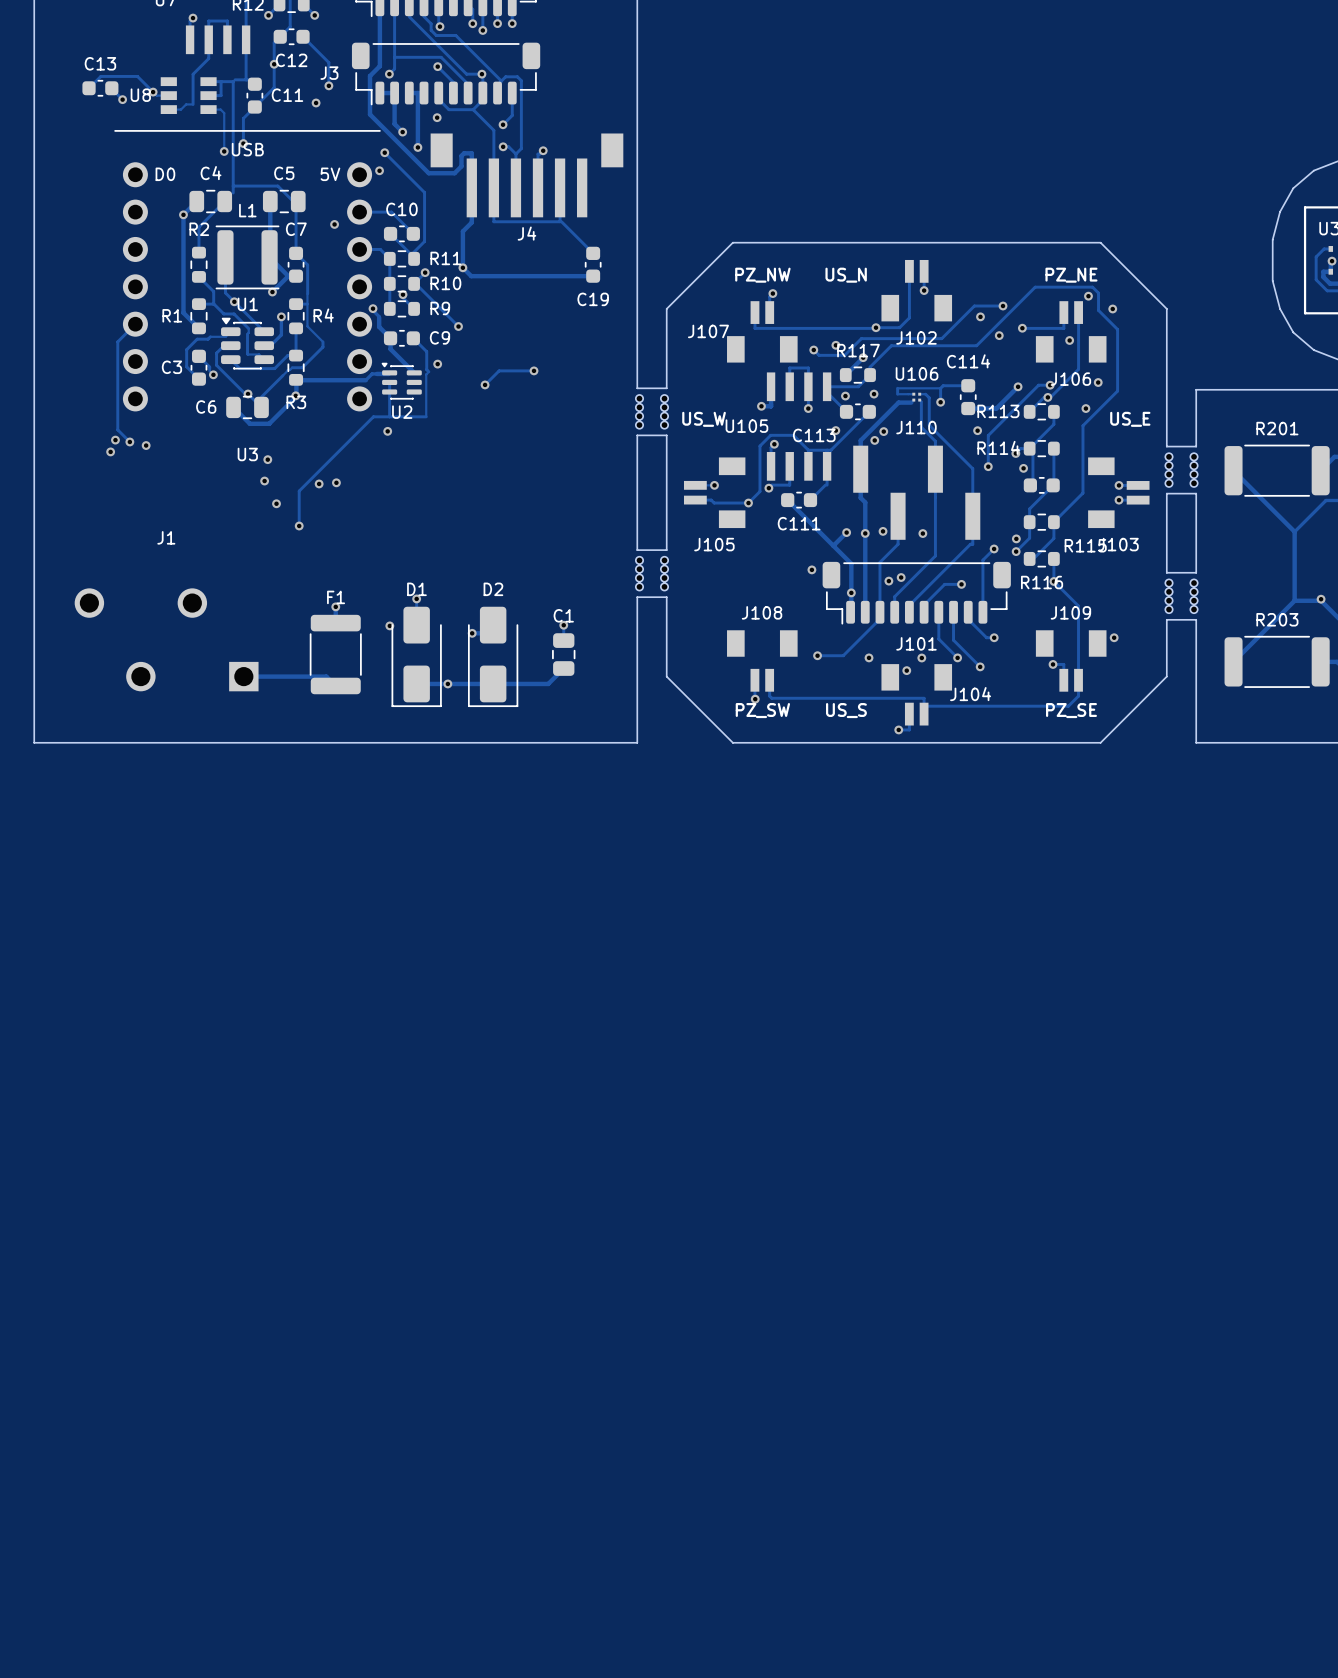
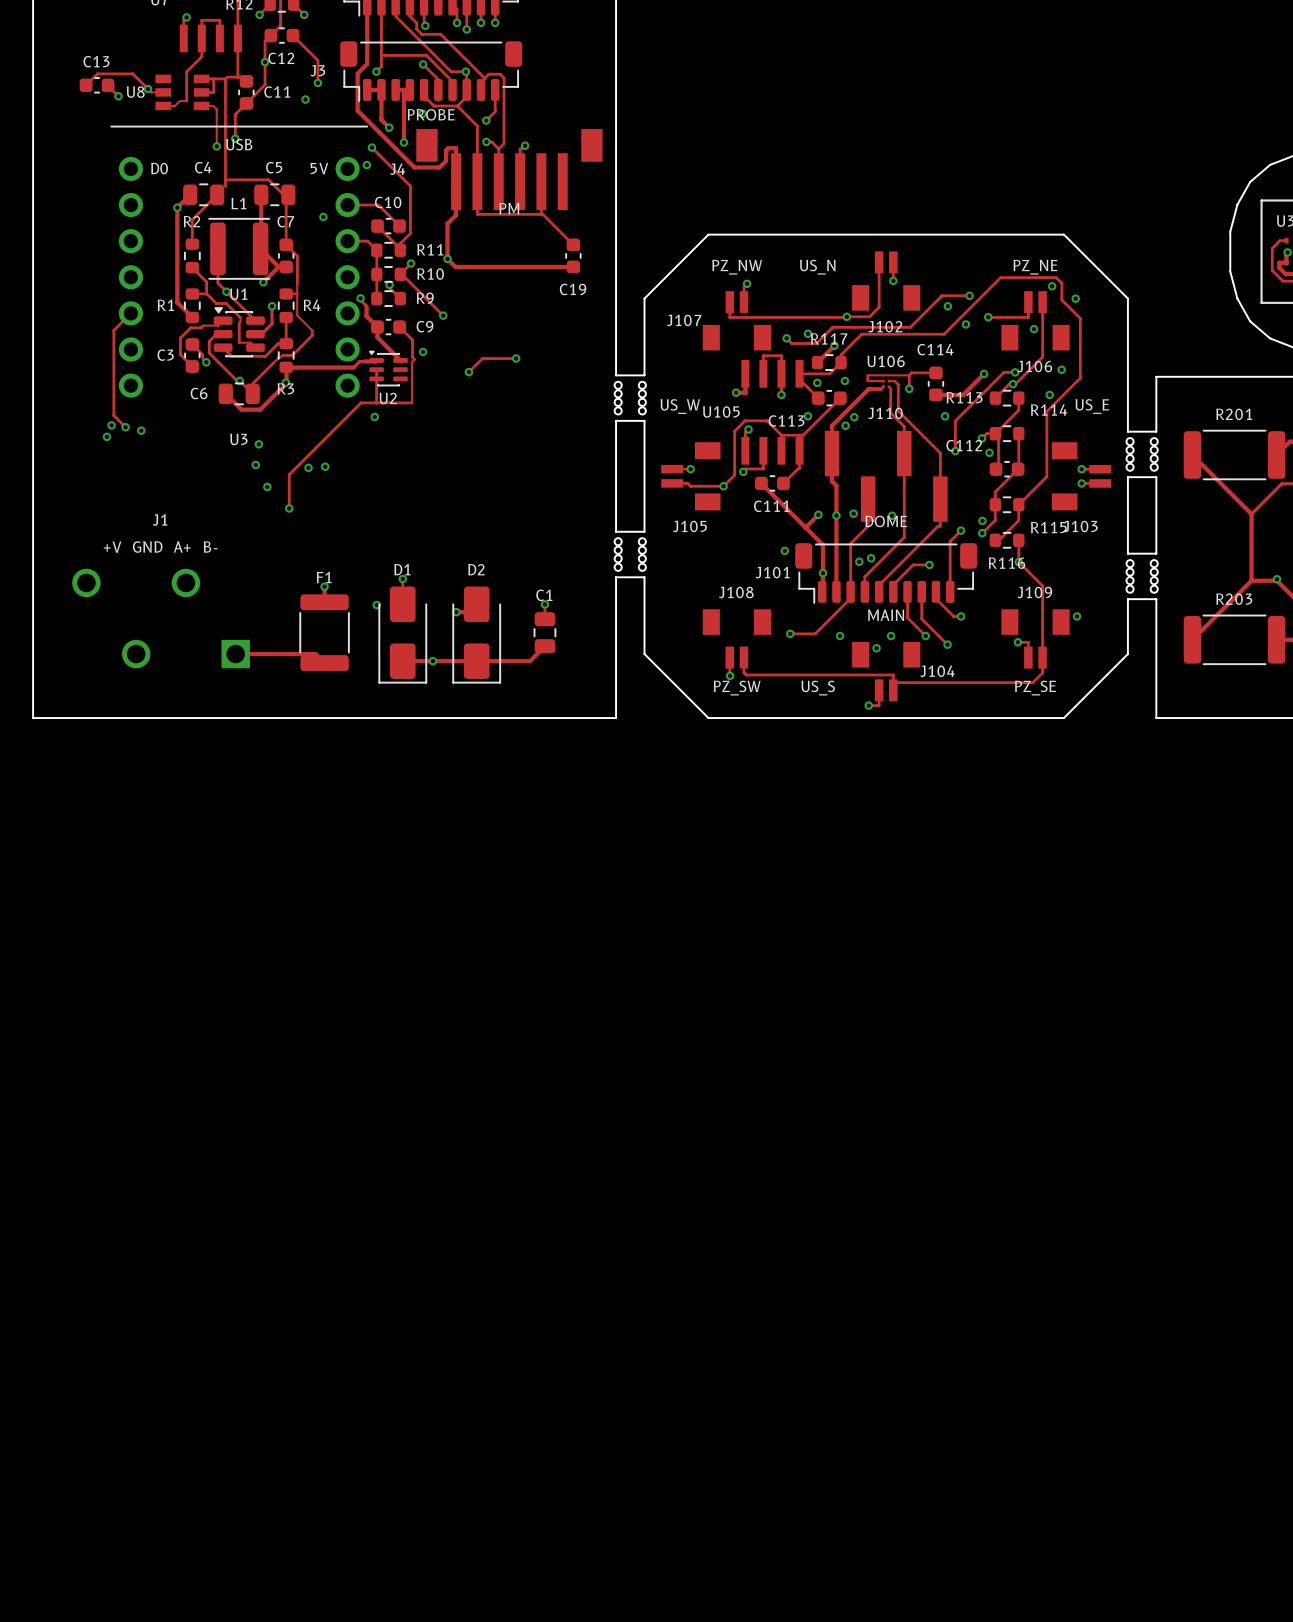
text: none -> PROBE (431, 114)
text: none -> PM (509, 208)
J4 name position: J4 (526, 233) -> J4 (397, 169)
R114 name position: R114 (998, 447) -> R114 (1049, 410)
C112 name: none -> C112 (964, 445)
text: none -> DOME (886, 521)
text: none -> +V GND A+ B- (160, 547)
text: none -> MAIN (886, 615)
J101 name position: J101 (916, 643) -> J101 (772, 572)

